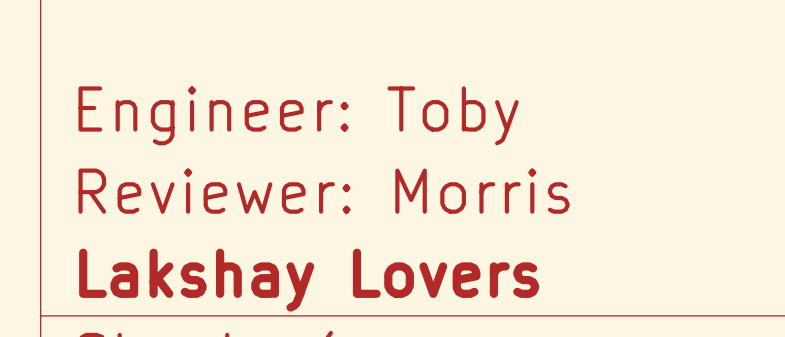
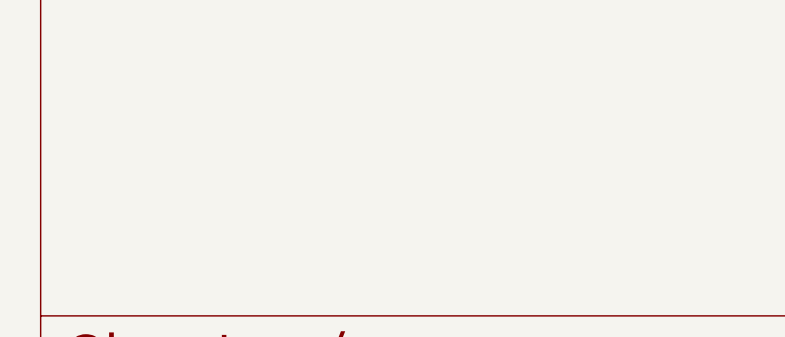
title block: Engineer: Toby (298, 115) -> none
title block: Reviewer: Morris (324, 191) -> none
title block: Lakshay Lovers (309, 280) -> none

